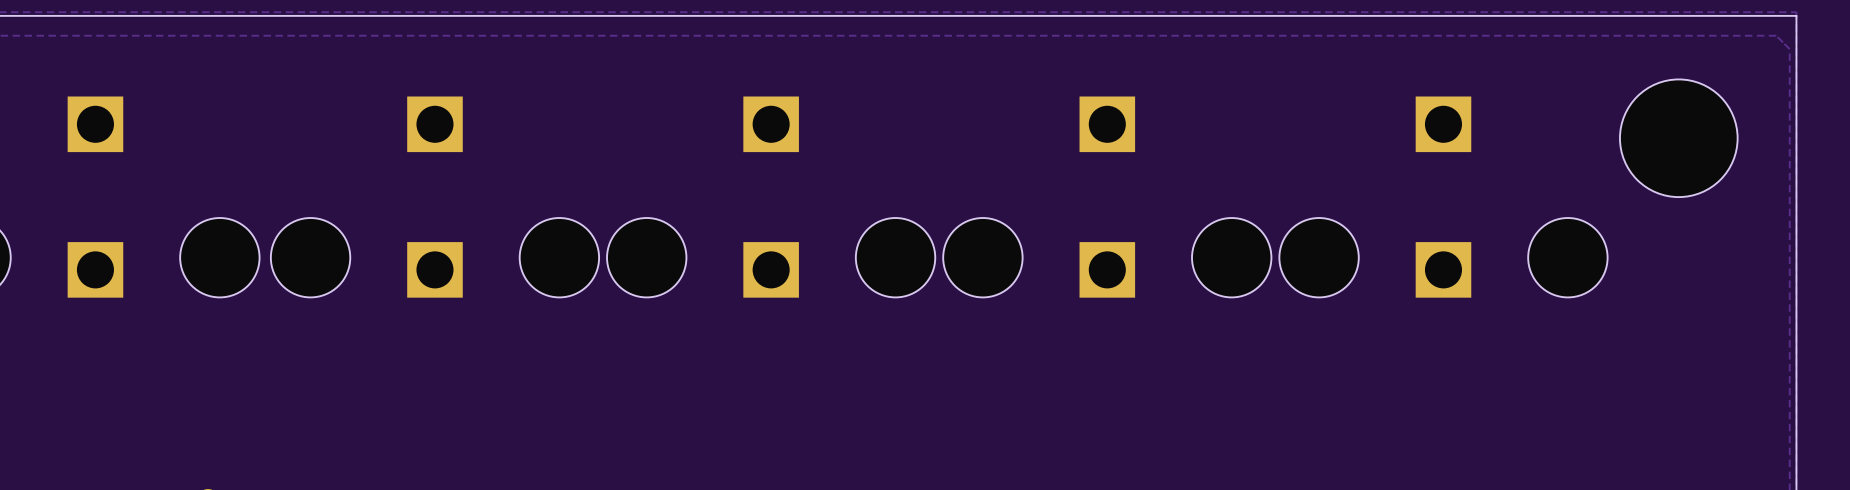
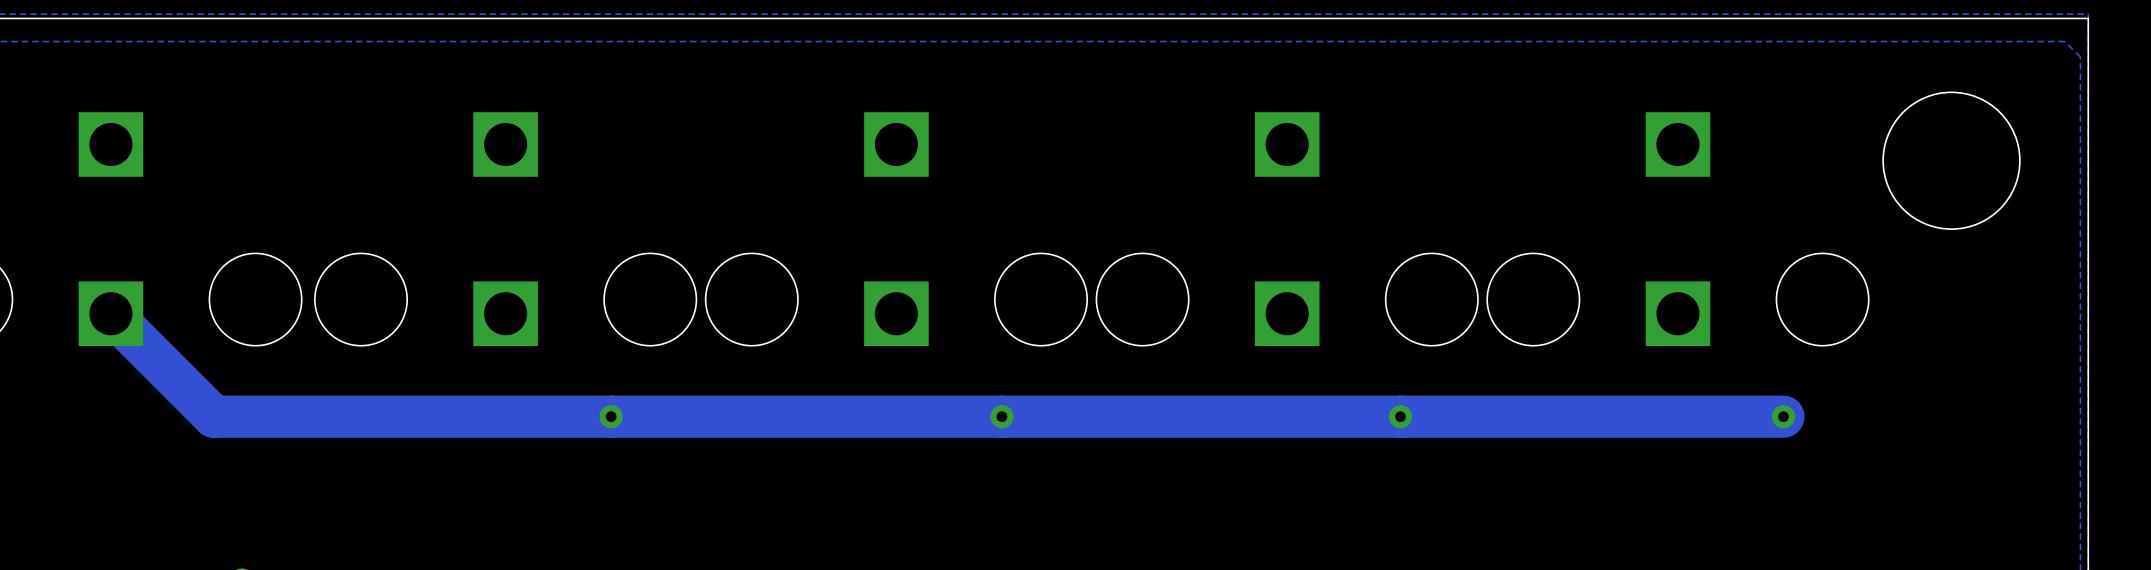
track: none -> (110, 313) (213, 416) (1783, 416)
via: none -> (611, 416)
via: none -> (1001, 416)
via: none -> (1400, 416)
via: none -> (1783, 416)

